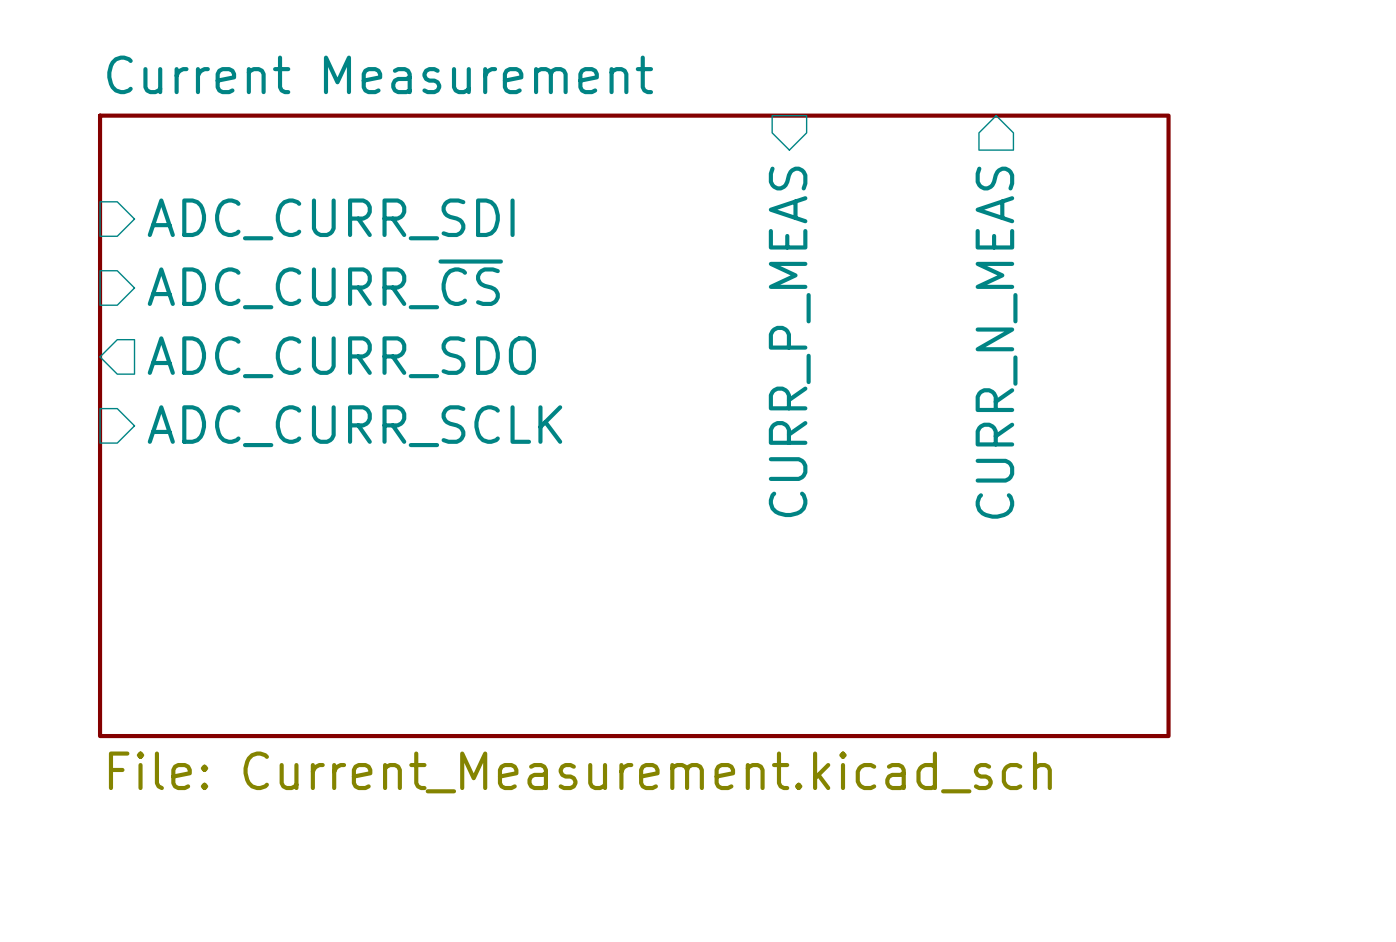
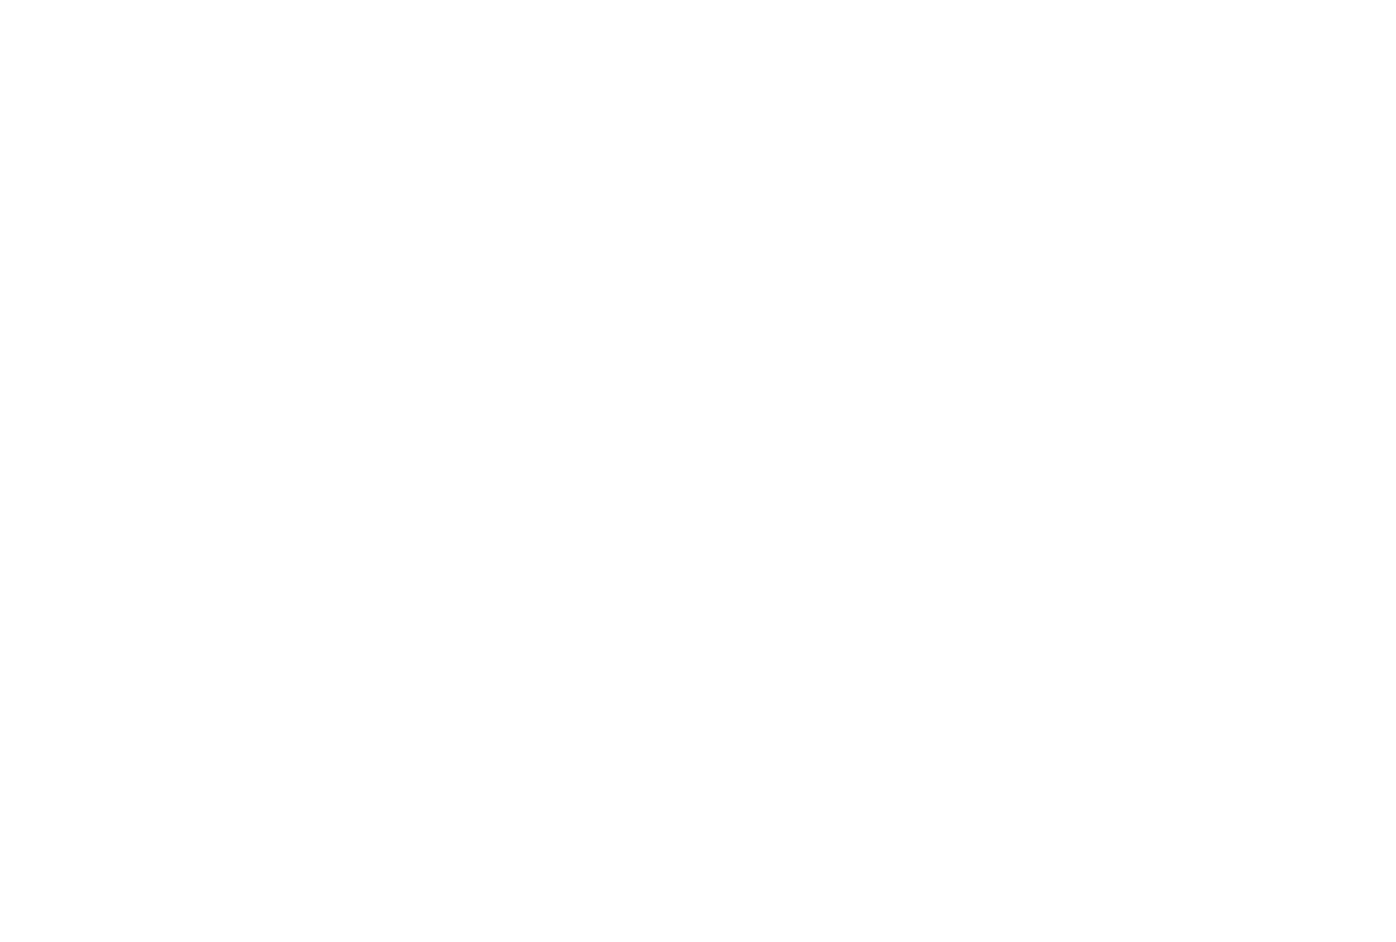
sheet pin: ADC_CURR_SDI (331, 219) -> none
sheet pin: ADC_CURR_~{CS} (325, 284) -> none
sheet pin: CURR_P_MEAS (789, 341) -> none
sheet pin: CURR_N_MEAS (996, 342) -> none
sheet pin: ADC_CURR_SDO (341, 357) -> none
sheet Current Measurement: File: Current_Measurement.kicad_sch (634, 425) -> none
sheet pin: ADC_CURR_SCLK (354, 426) -> none

